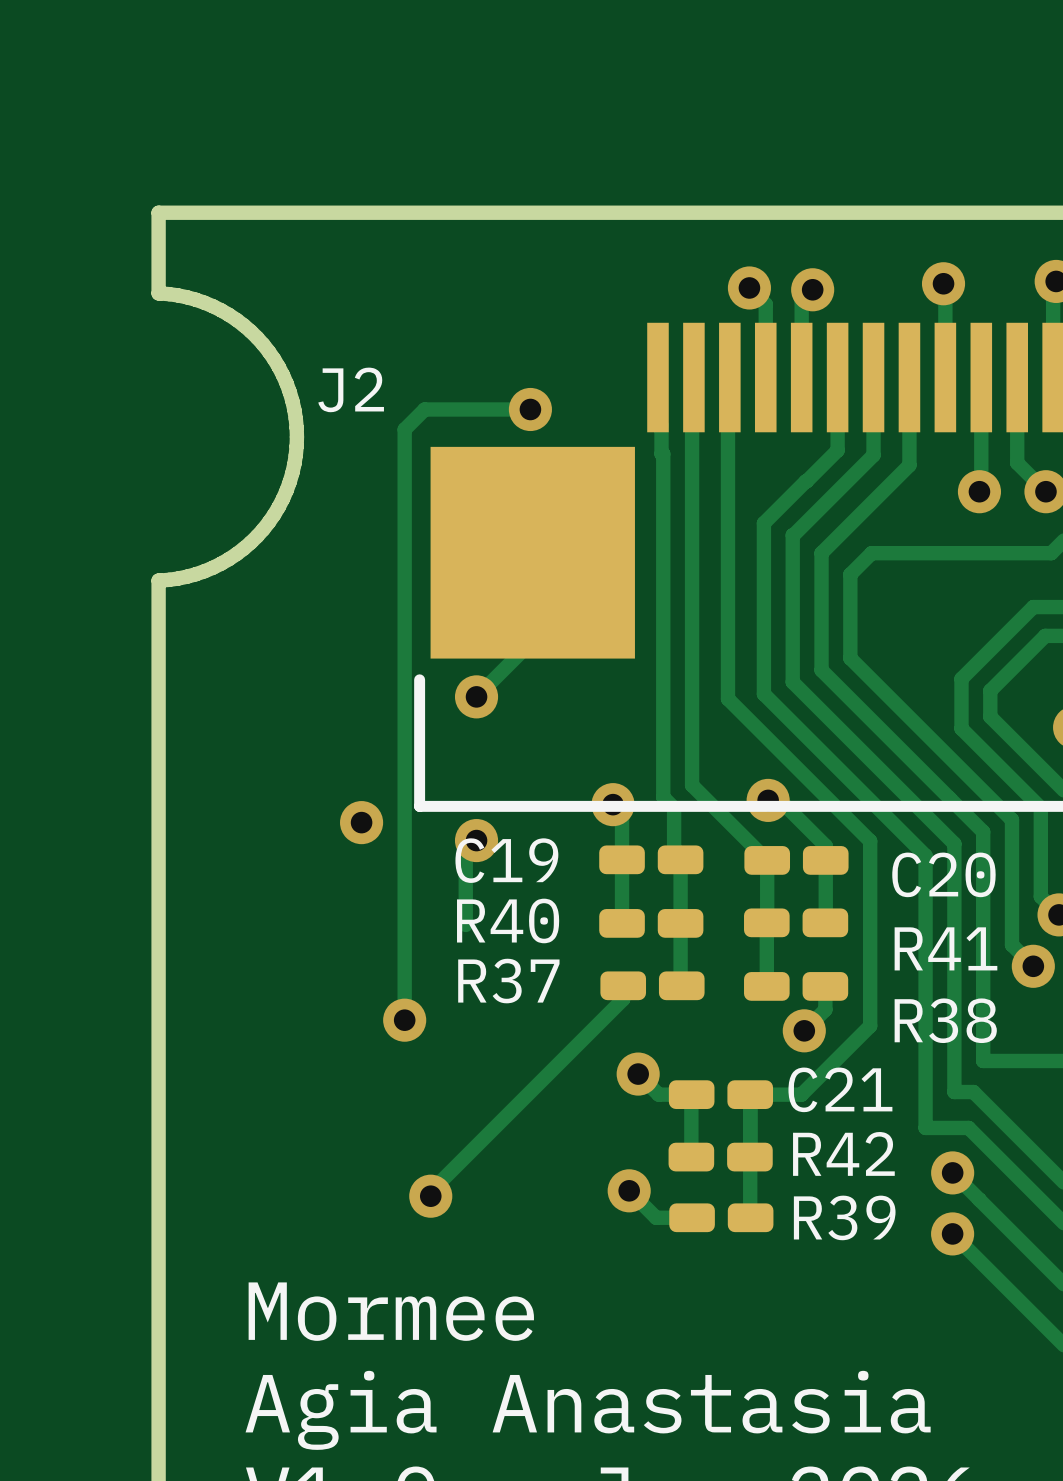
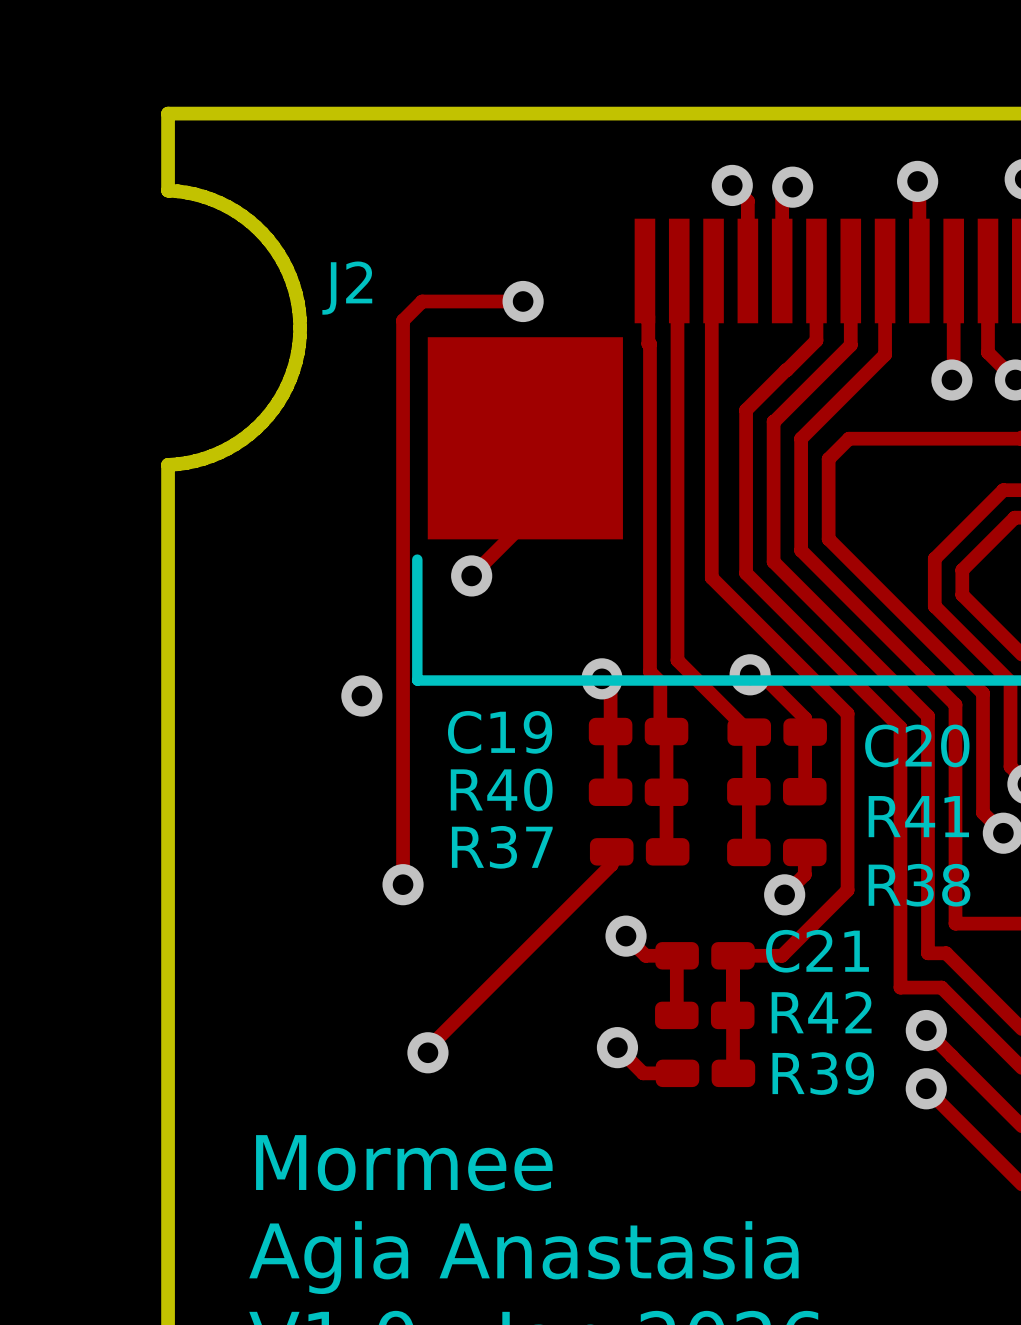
track: (476, 840) (465, 851) (465, 924) -> none
via: (476, 840) -> none

